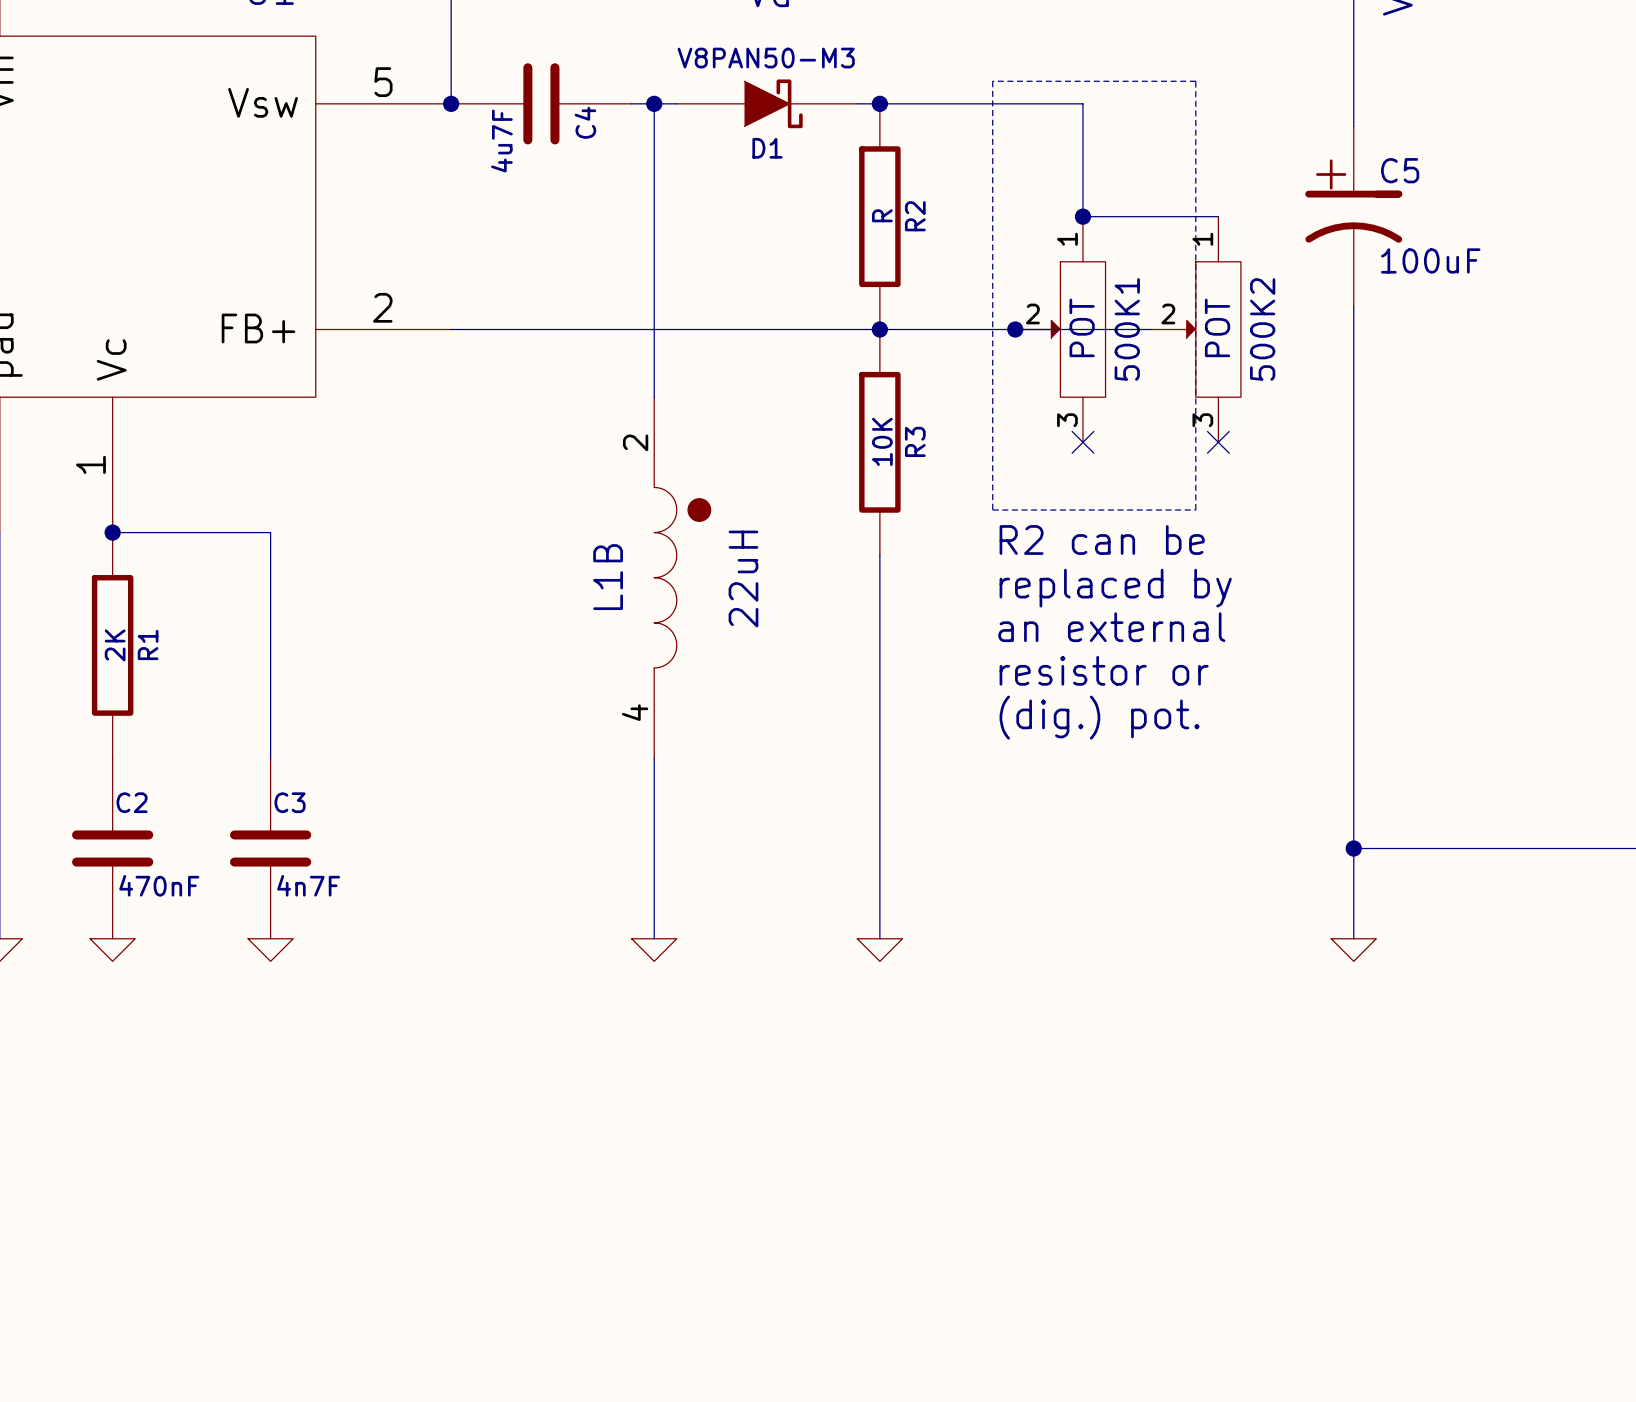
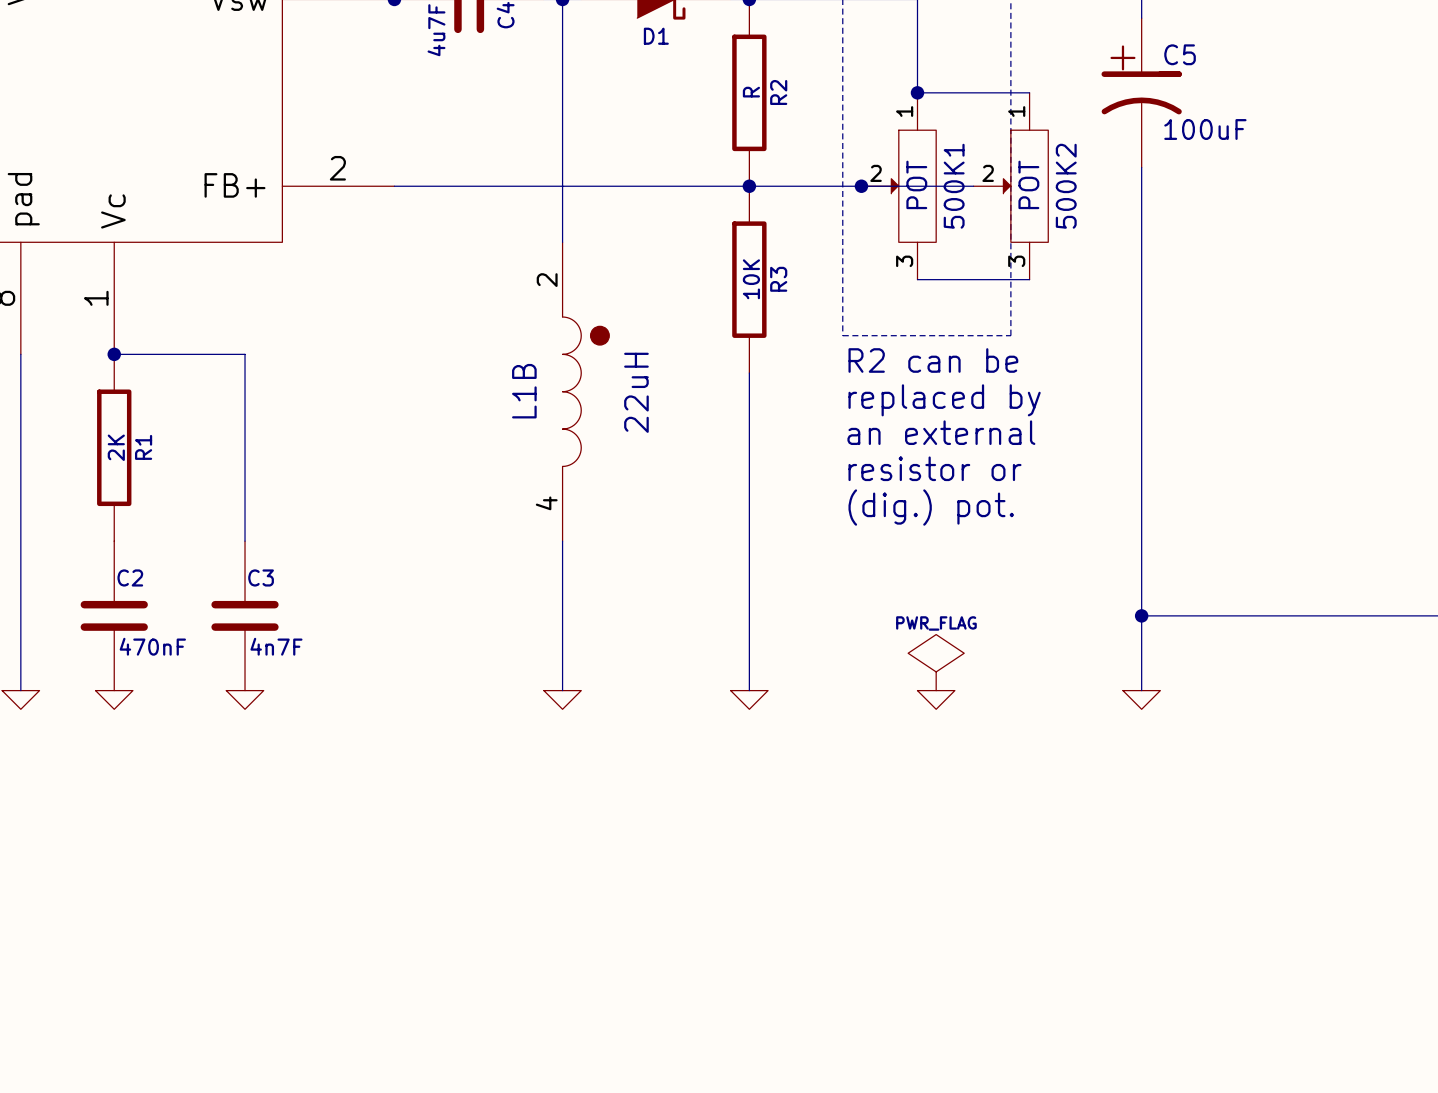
wire: none -> (917, 279) (1029, 279)
no-connect mark: (1082, 442) -> none
no-connect mark: (1218, 442) -> none
power symbol: none -> PWR_FLAG (936, 662)
power symbol: none -> (936, 699)

